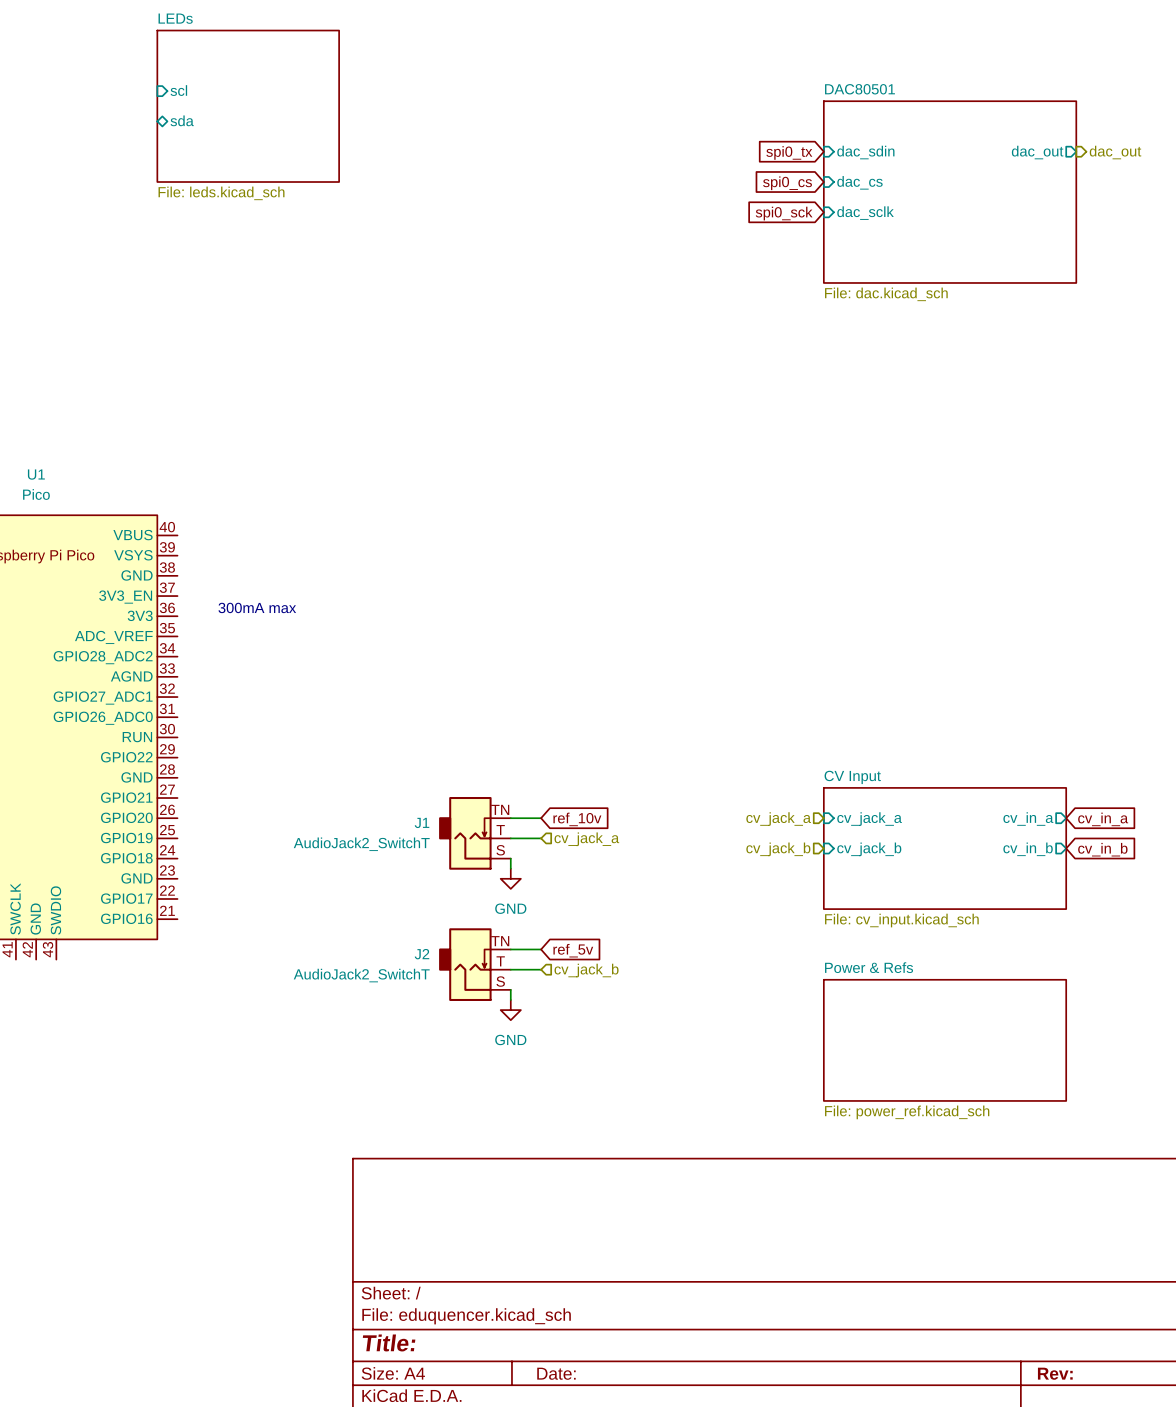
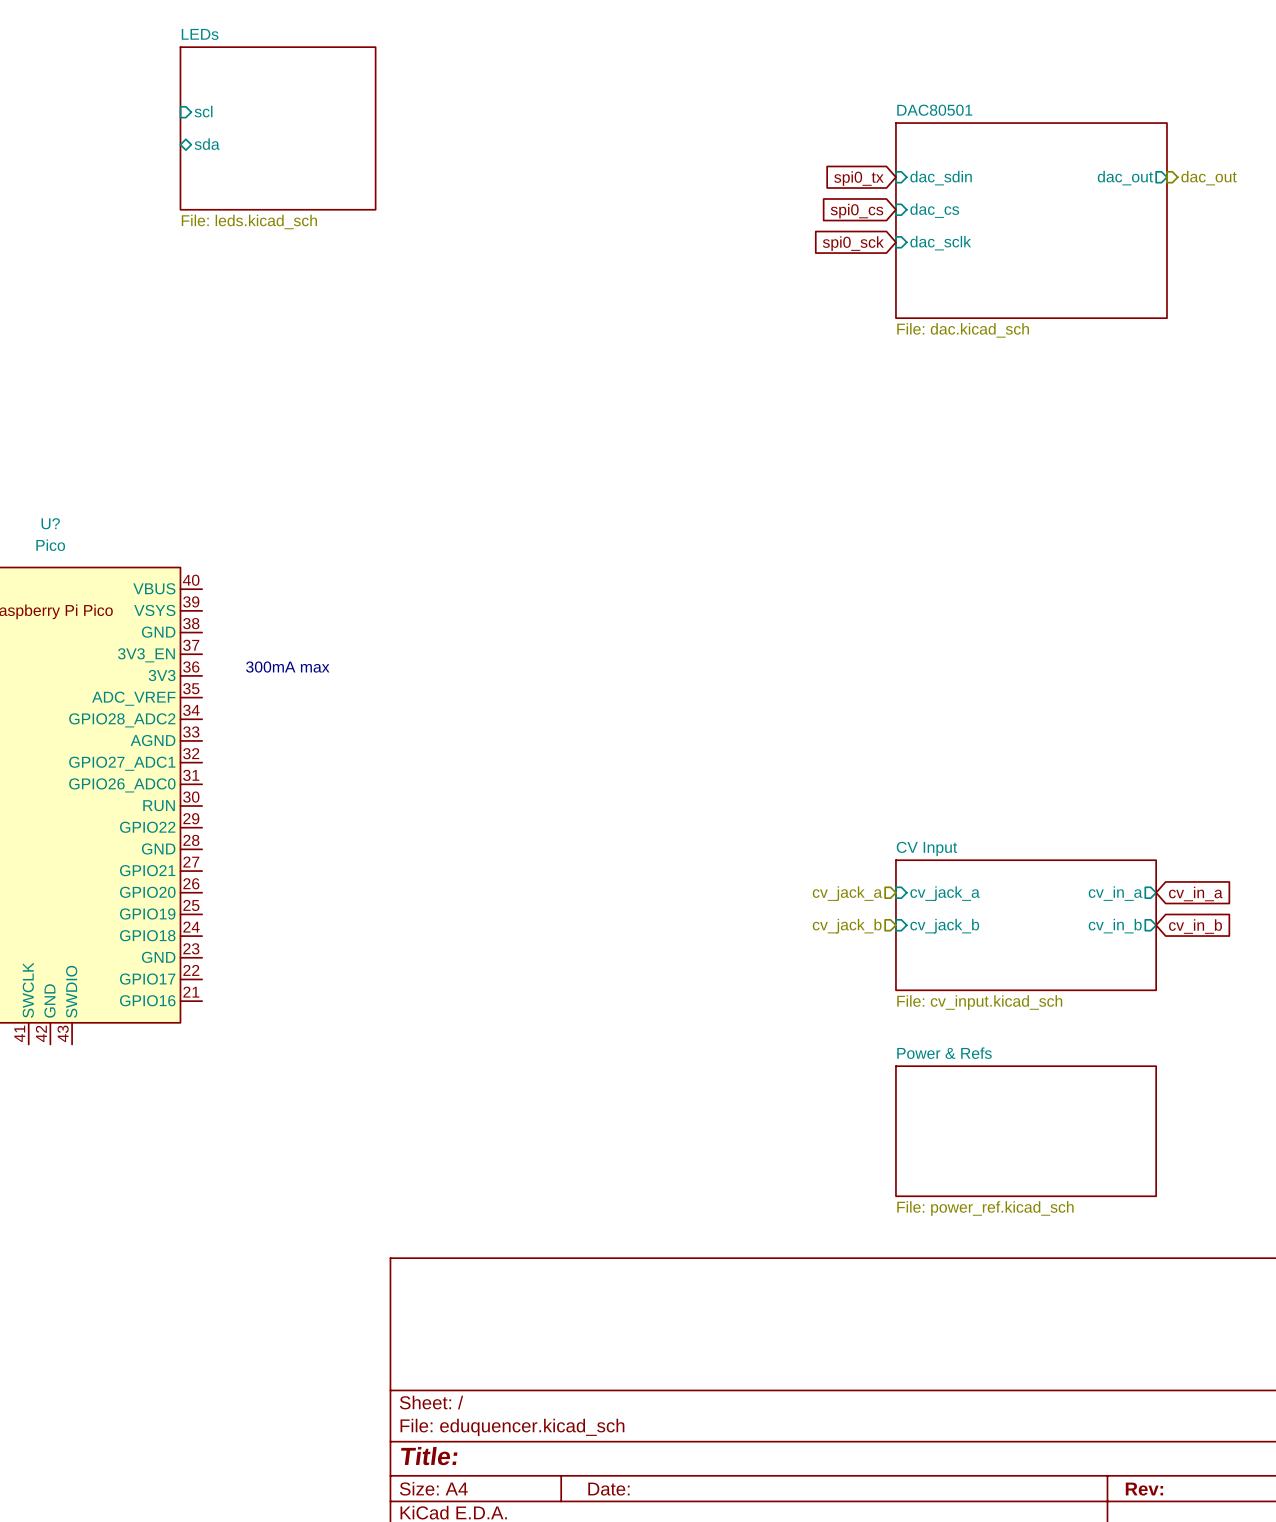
U1 name: U1 (36, 474) -> U? (50, 523)
wire: (510, 818) (541, 818) -> none
global label: ref_10v (577, 819) -> none
J1: AudioJack2_SwitchT (474, 833) -> none
wire: (510, 838) (541, 838) -> none
hierarchical label: cv_jack_a (586, 839) -> none
wire: (510, 858) (510, 868) -> none
power symbol: GND (510, 878) -> none
wire: (510, 949) (541, 949) -> none
global label: ref_5v (573, 950) -> none
J2: AudioJack2_SwitchT (474, 964) -> none
wire: (510, 969) (541, 969) -> none
hierarchical label: cv_jack_b (586, 970) -> none
wire: (510, 989) (510, 999) -> none
power symbol: GND (510, 1010) -> none

